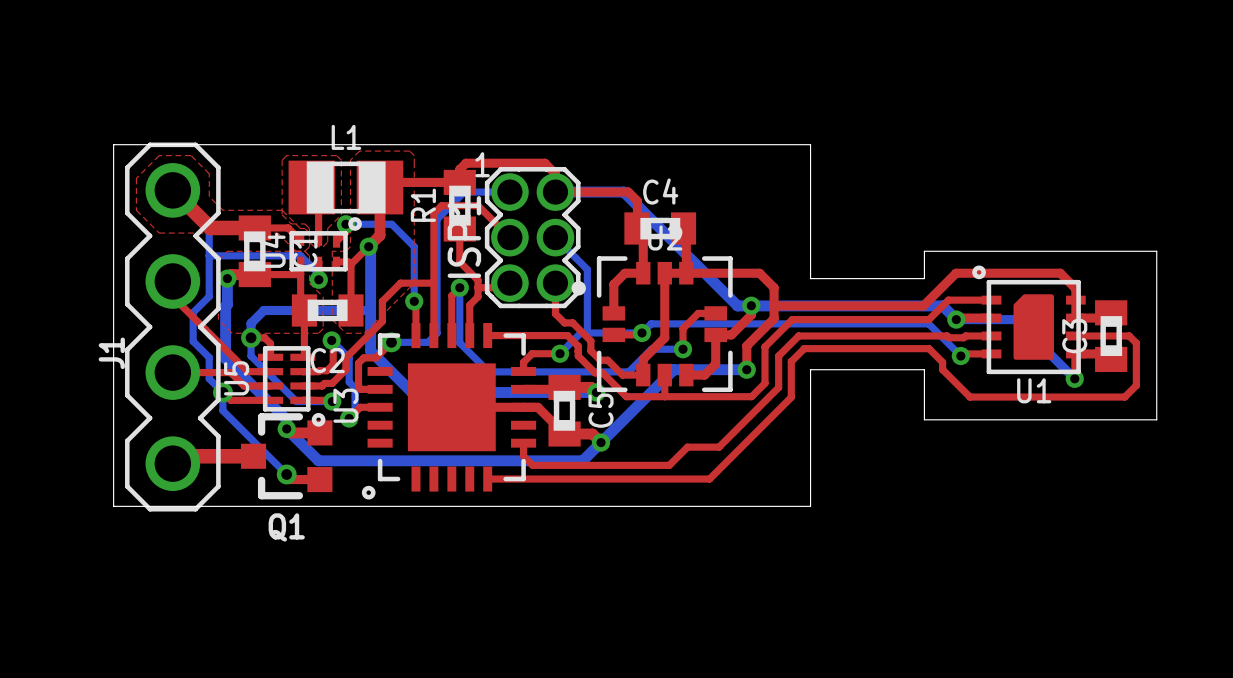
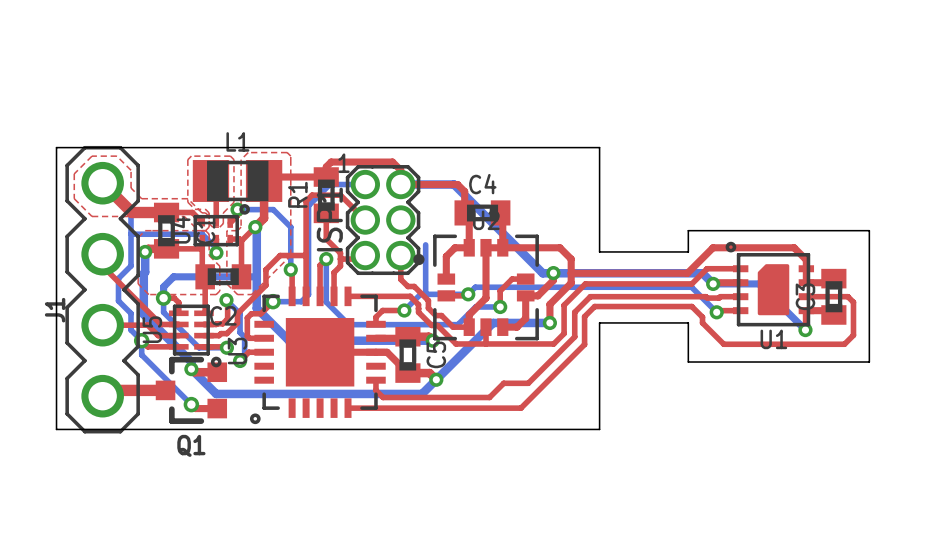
bottom track: (555, 237) (587, 269) -> none

